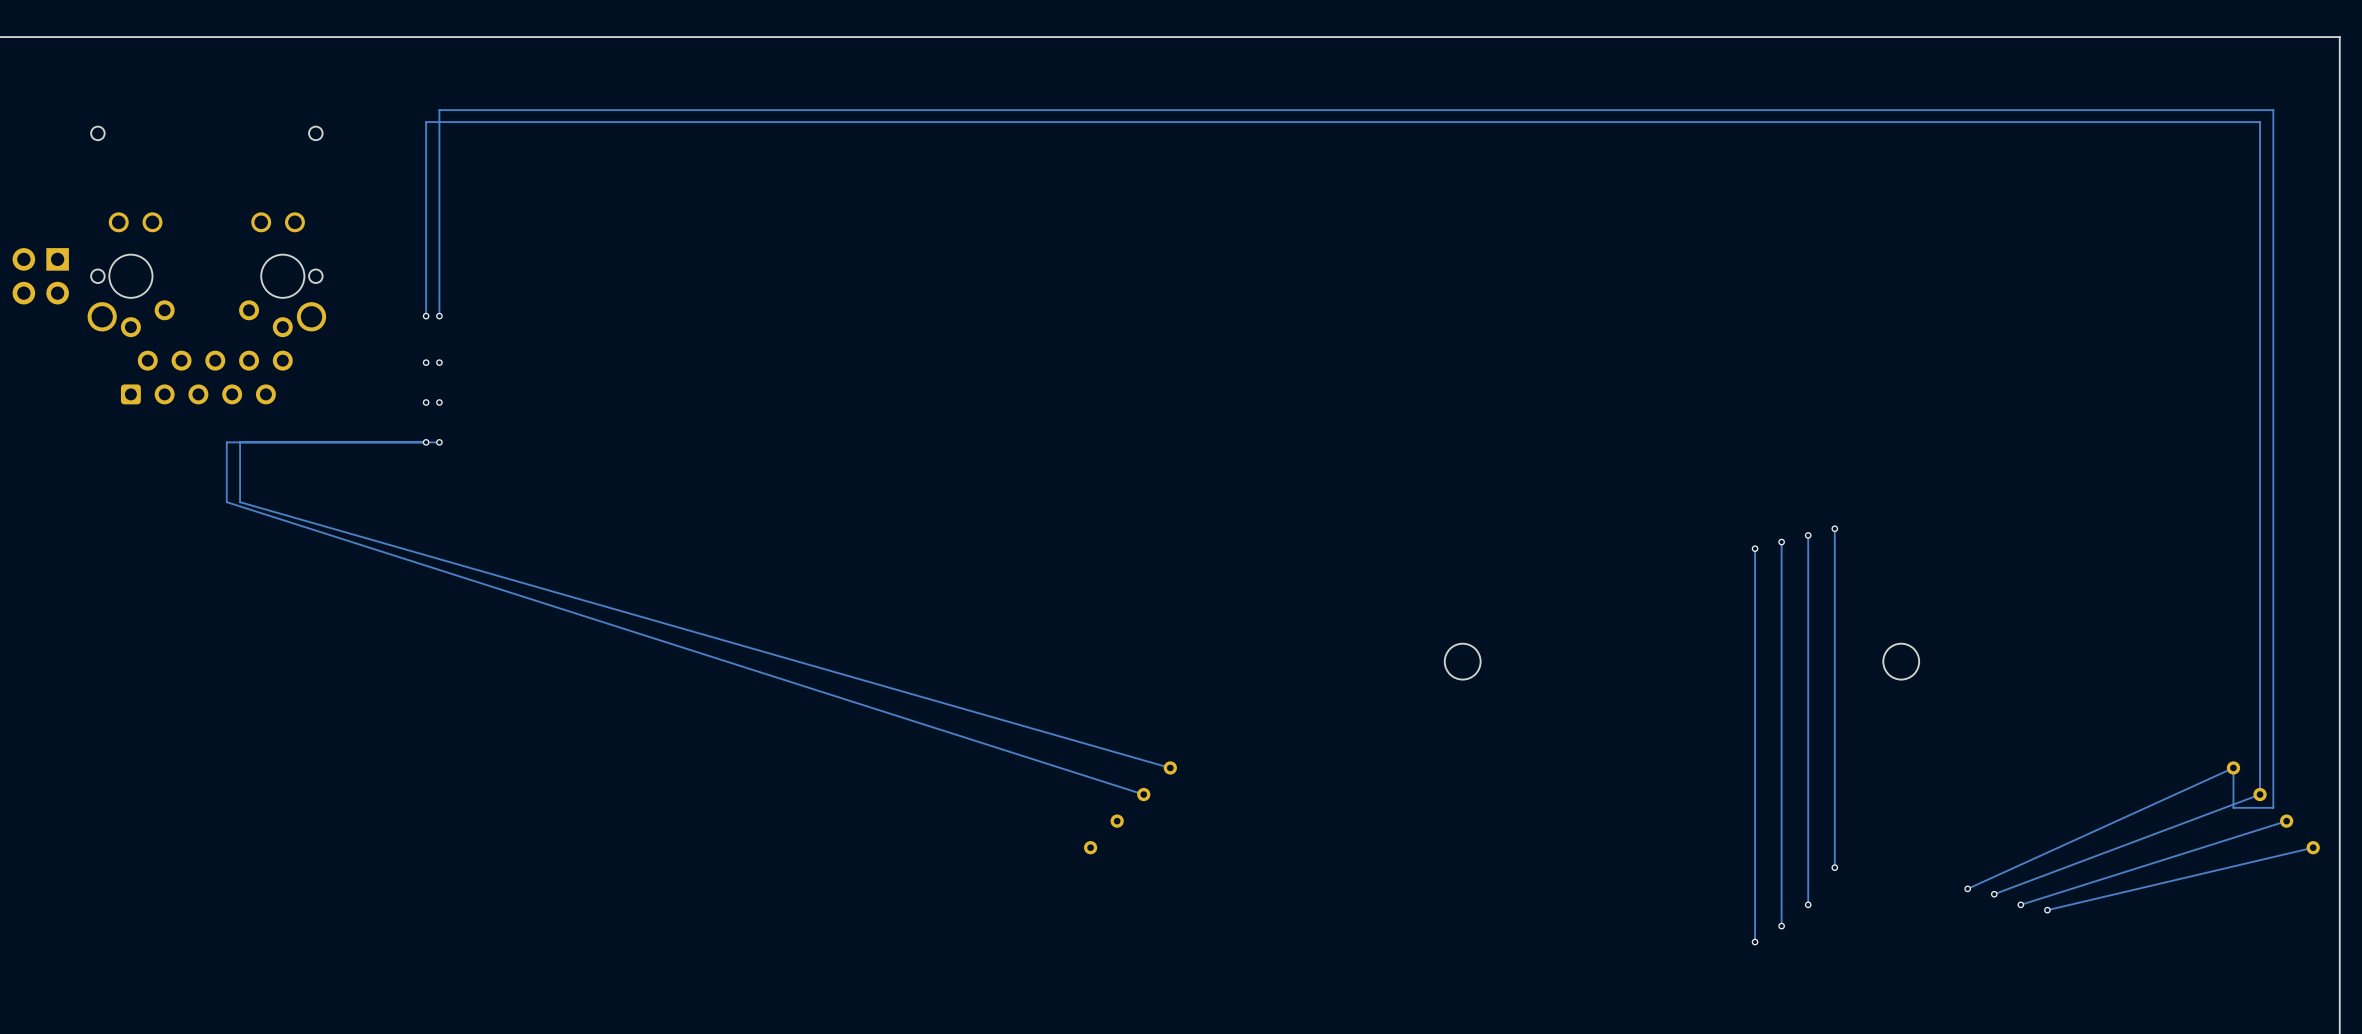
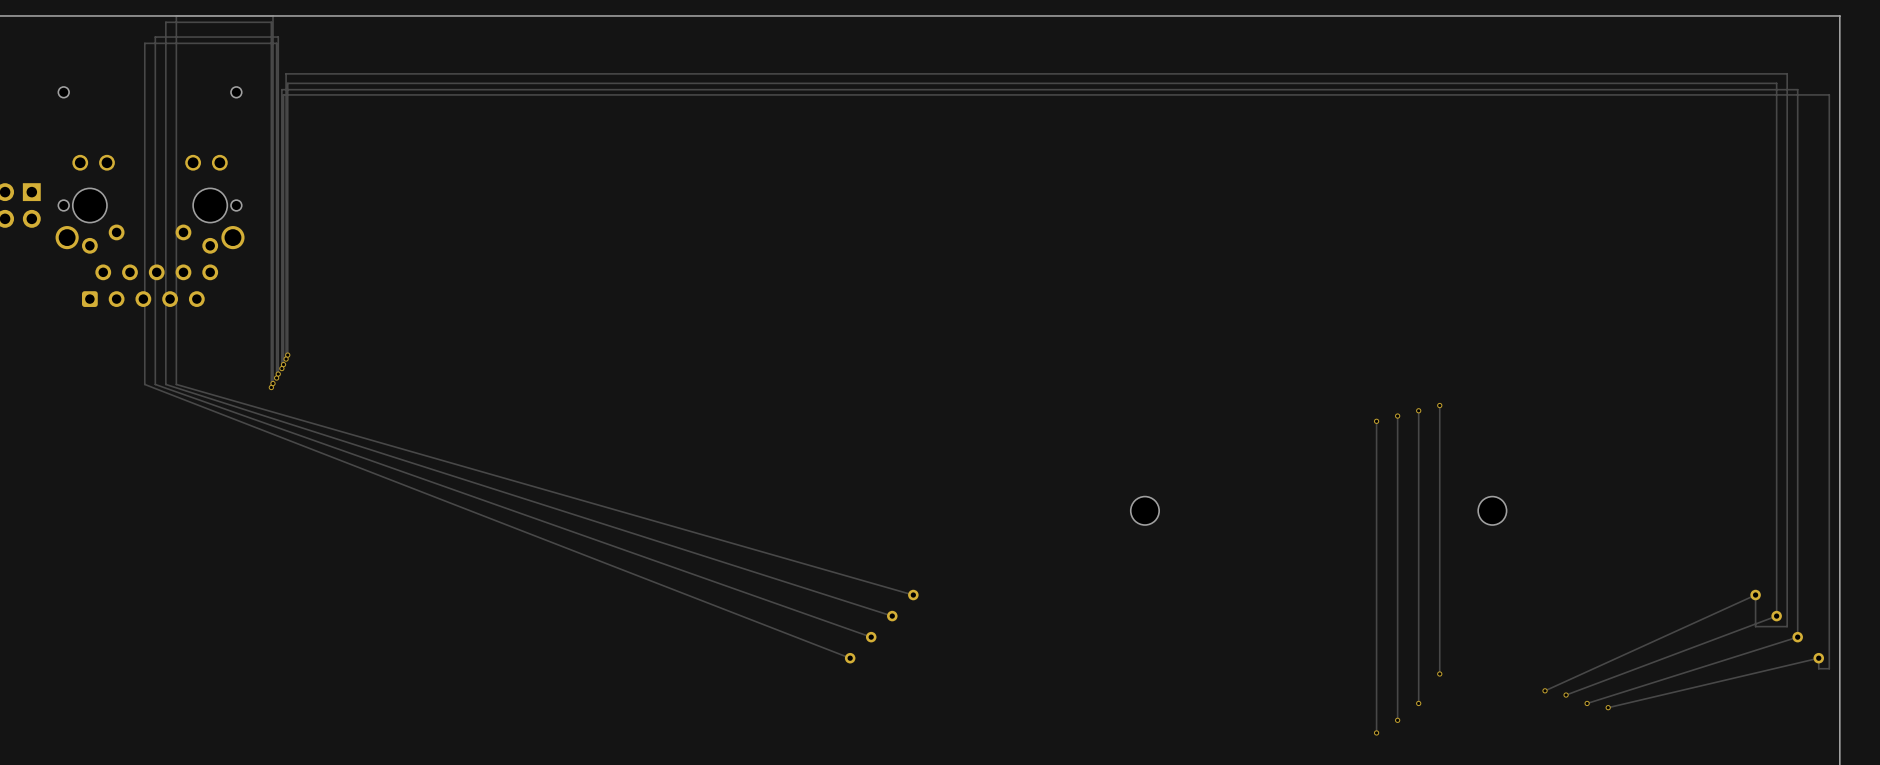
track: (439, 110) (439, 316) -> (334, 73) (286, 73) (286, 359)
track: (426, 122) (426, 316) -> (323, 83) (287, 83) (287, 355)
via: (426, 316) -> none
via: (439, 316) -> none
via: (426, 362) -> none
via: (439, 362) -> none
via: (426, 402) -> none
via: (439, 402) -> none
track: none -> (176, 337) (176, 15) (273, 15) (273, 383)
via: (426, 442) -> none
track: (439, 442) (226, 442) -> (271, 387) (271, 22) (165, 22) (165, 337)
via: (439, 442) -> none
via: none -> (287, 355)
via: none -> (286, 359)
track: none -> (283, 364) (283, 94) (1829, 94) (1829, 668) (1818, 668) (1818, 658)
via: none -> (283, 364)
track: none -> (281, 368) (281, 89) (1797, 89) (1797, 637)
via: none -> (281, 368)
track: none -> (278, 374) (278, 37) (155, 37) (155, 384) (871, 637)
via: none -> (278, 374)
track: none -> (276, 378) (276, 43) (144, 43) (144, 384) (850, 658)
via: none -> (276, 378)
via: none -> (273, 383)
via: none -> (271, 387)

